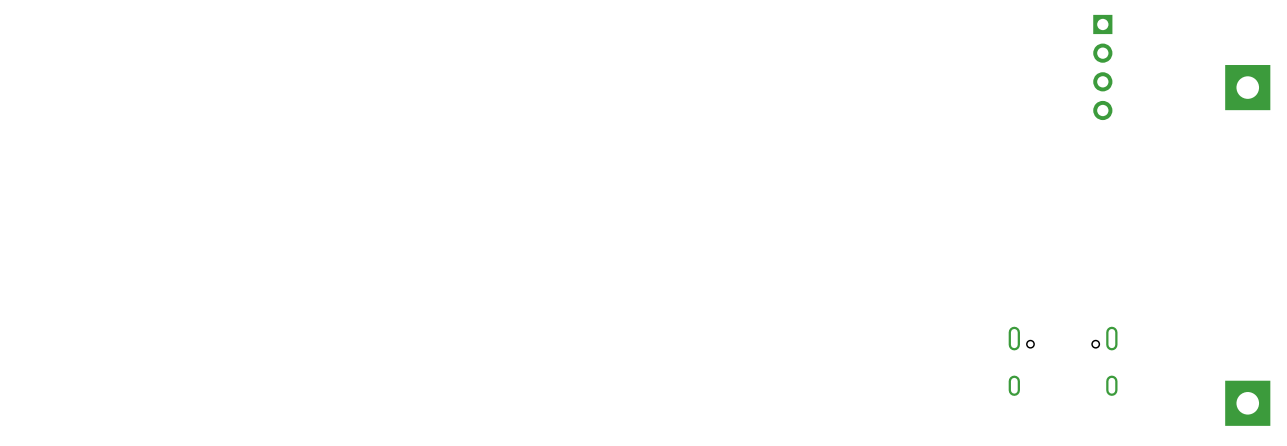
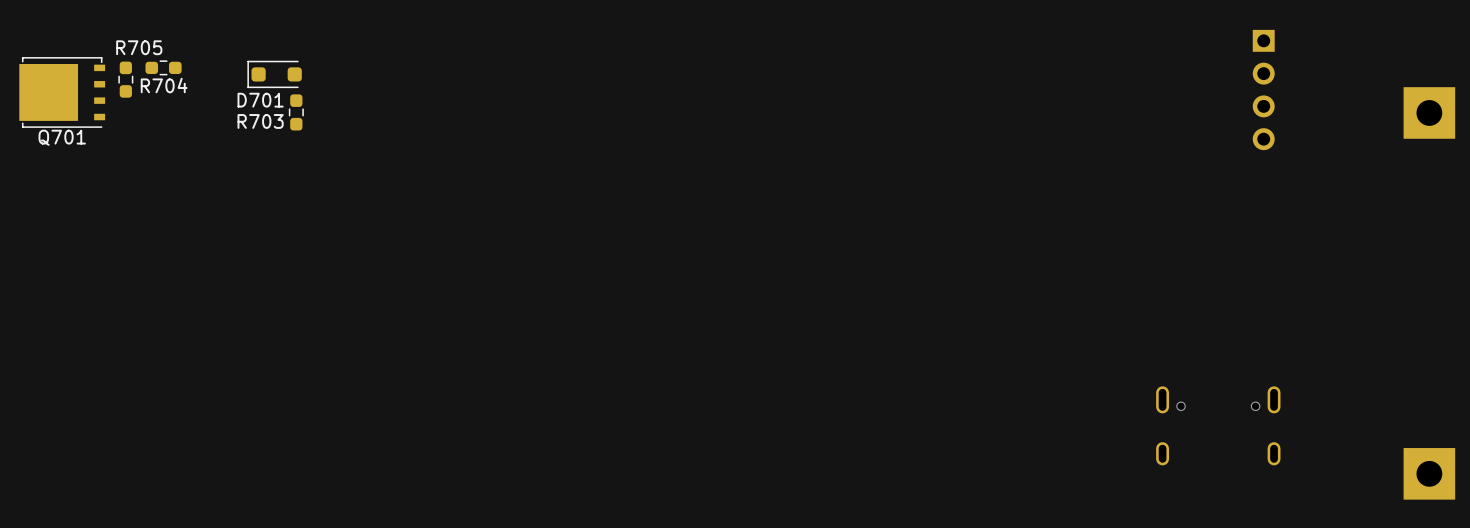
R704: none -> (163, 67)
D701: none -> (274, 74)
R705: none -> (125, 79)
Q701: none -> (62, 92)
R703: none -> (296, 112)

